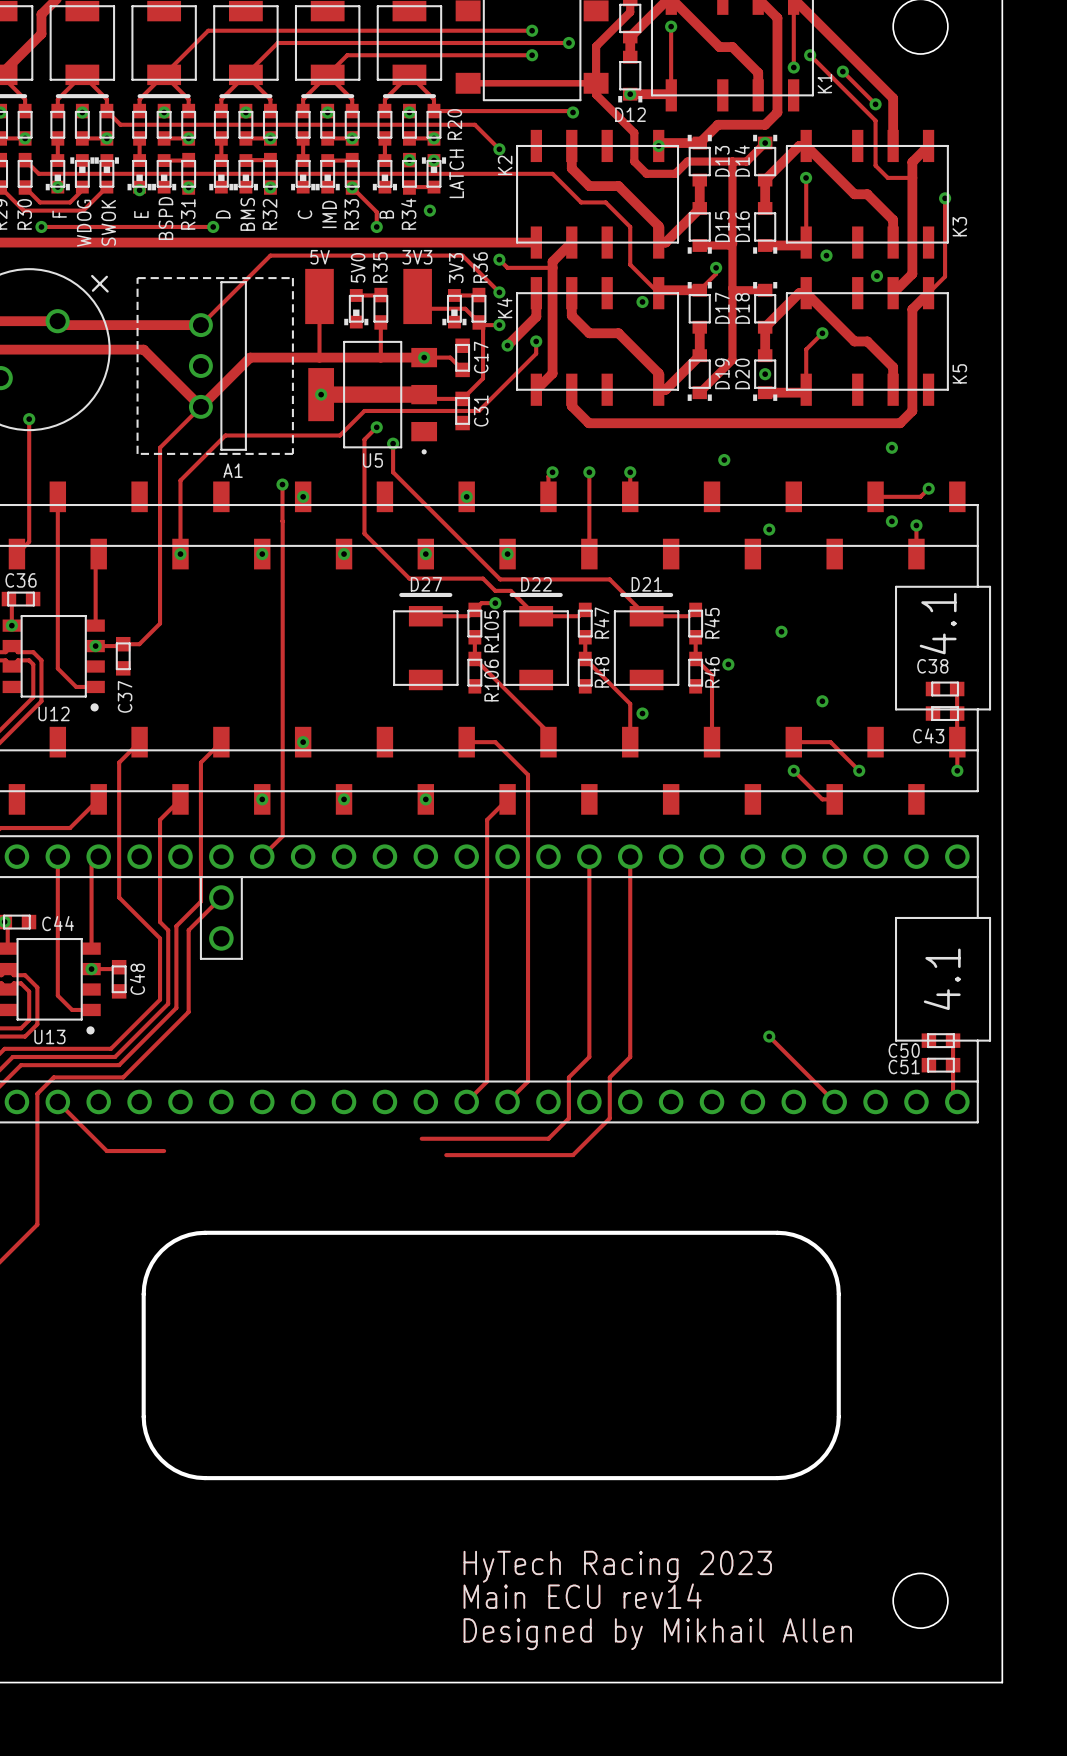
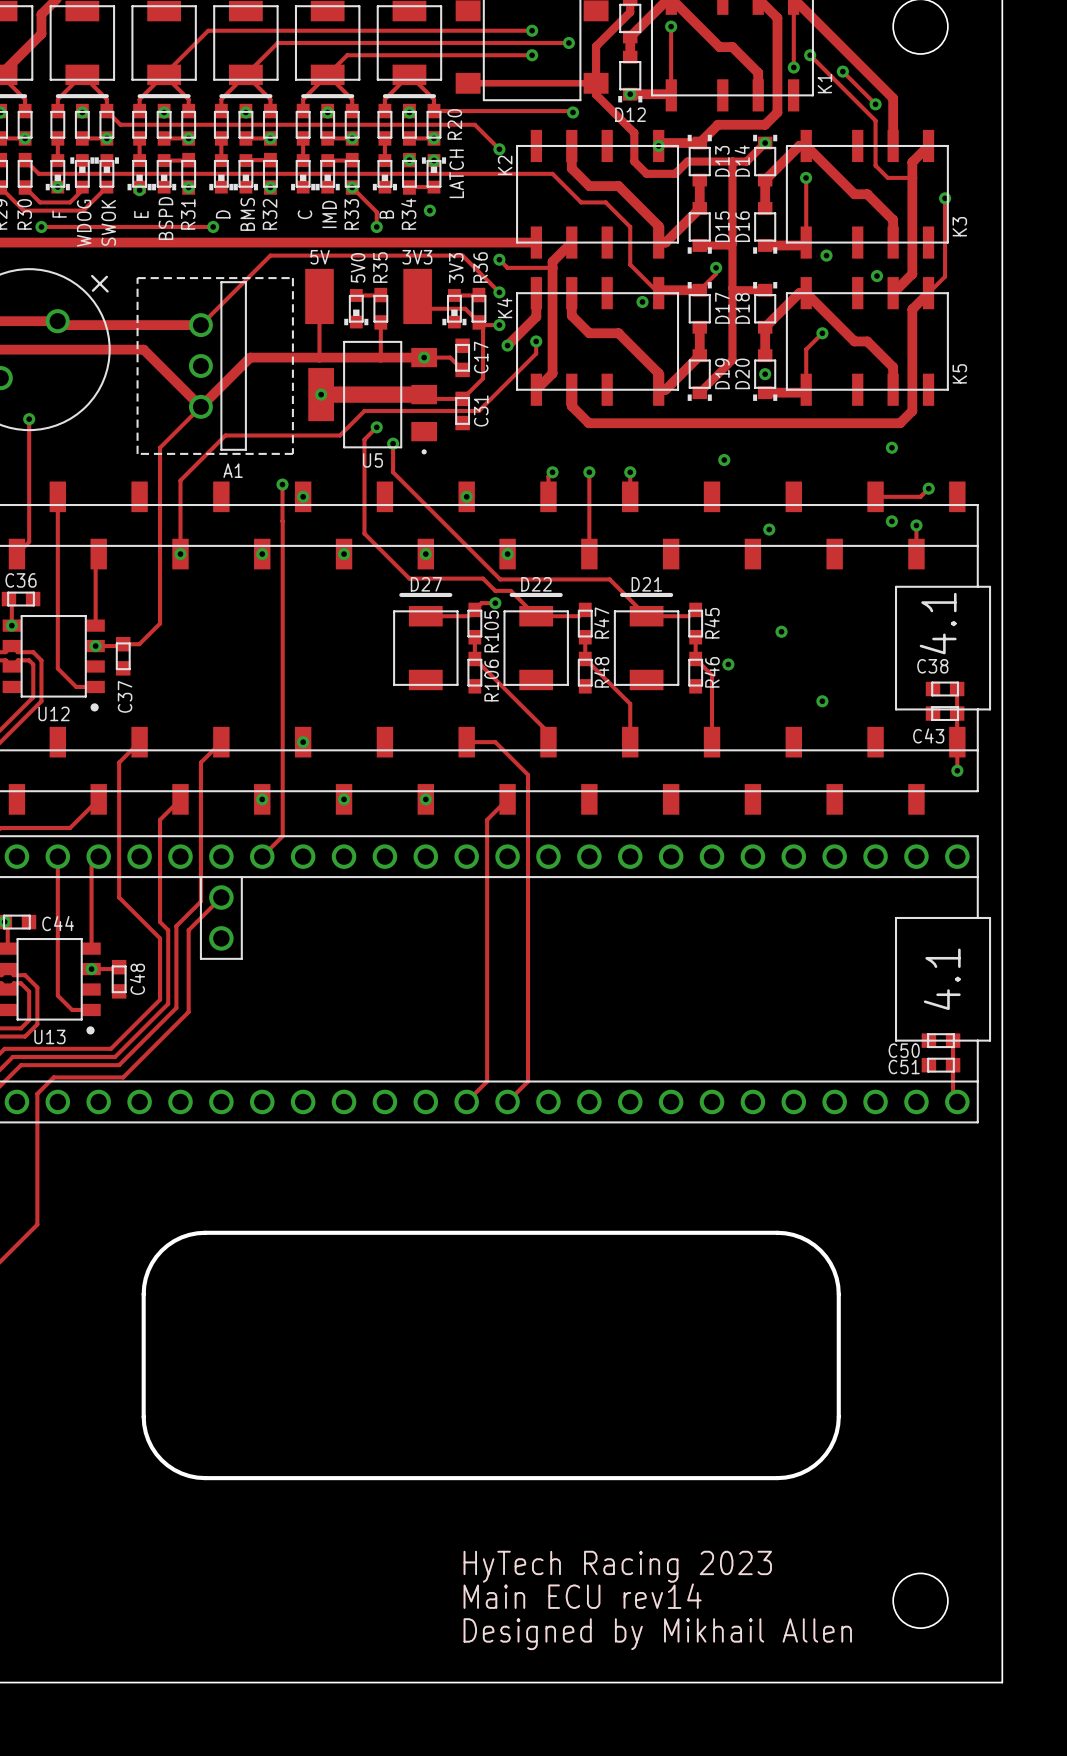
via: (642, 713) -> none
track: (793, 742) (830, 742) (859, 770) -> none
track: (793, 770) (822, 799) (834, 799) -> none
via: (793, 770) -> none
via: (859, 770) -> none
track: (589, 856) (589, 1056) (568, 1077) (568, 1118) (548, 1138) (421, 1138) -> none
track: (630, 856) (630, 1056) (609, 1077) (609, 1118) (573, 1155) (446, 1155) -> none
track: (769, 1036) (834, 1101) -> none
via: (769, 1036) -> none
track: (57, 1101) (106, 1151) (164, 1151) -> none

